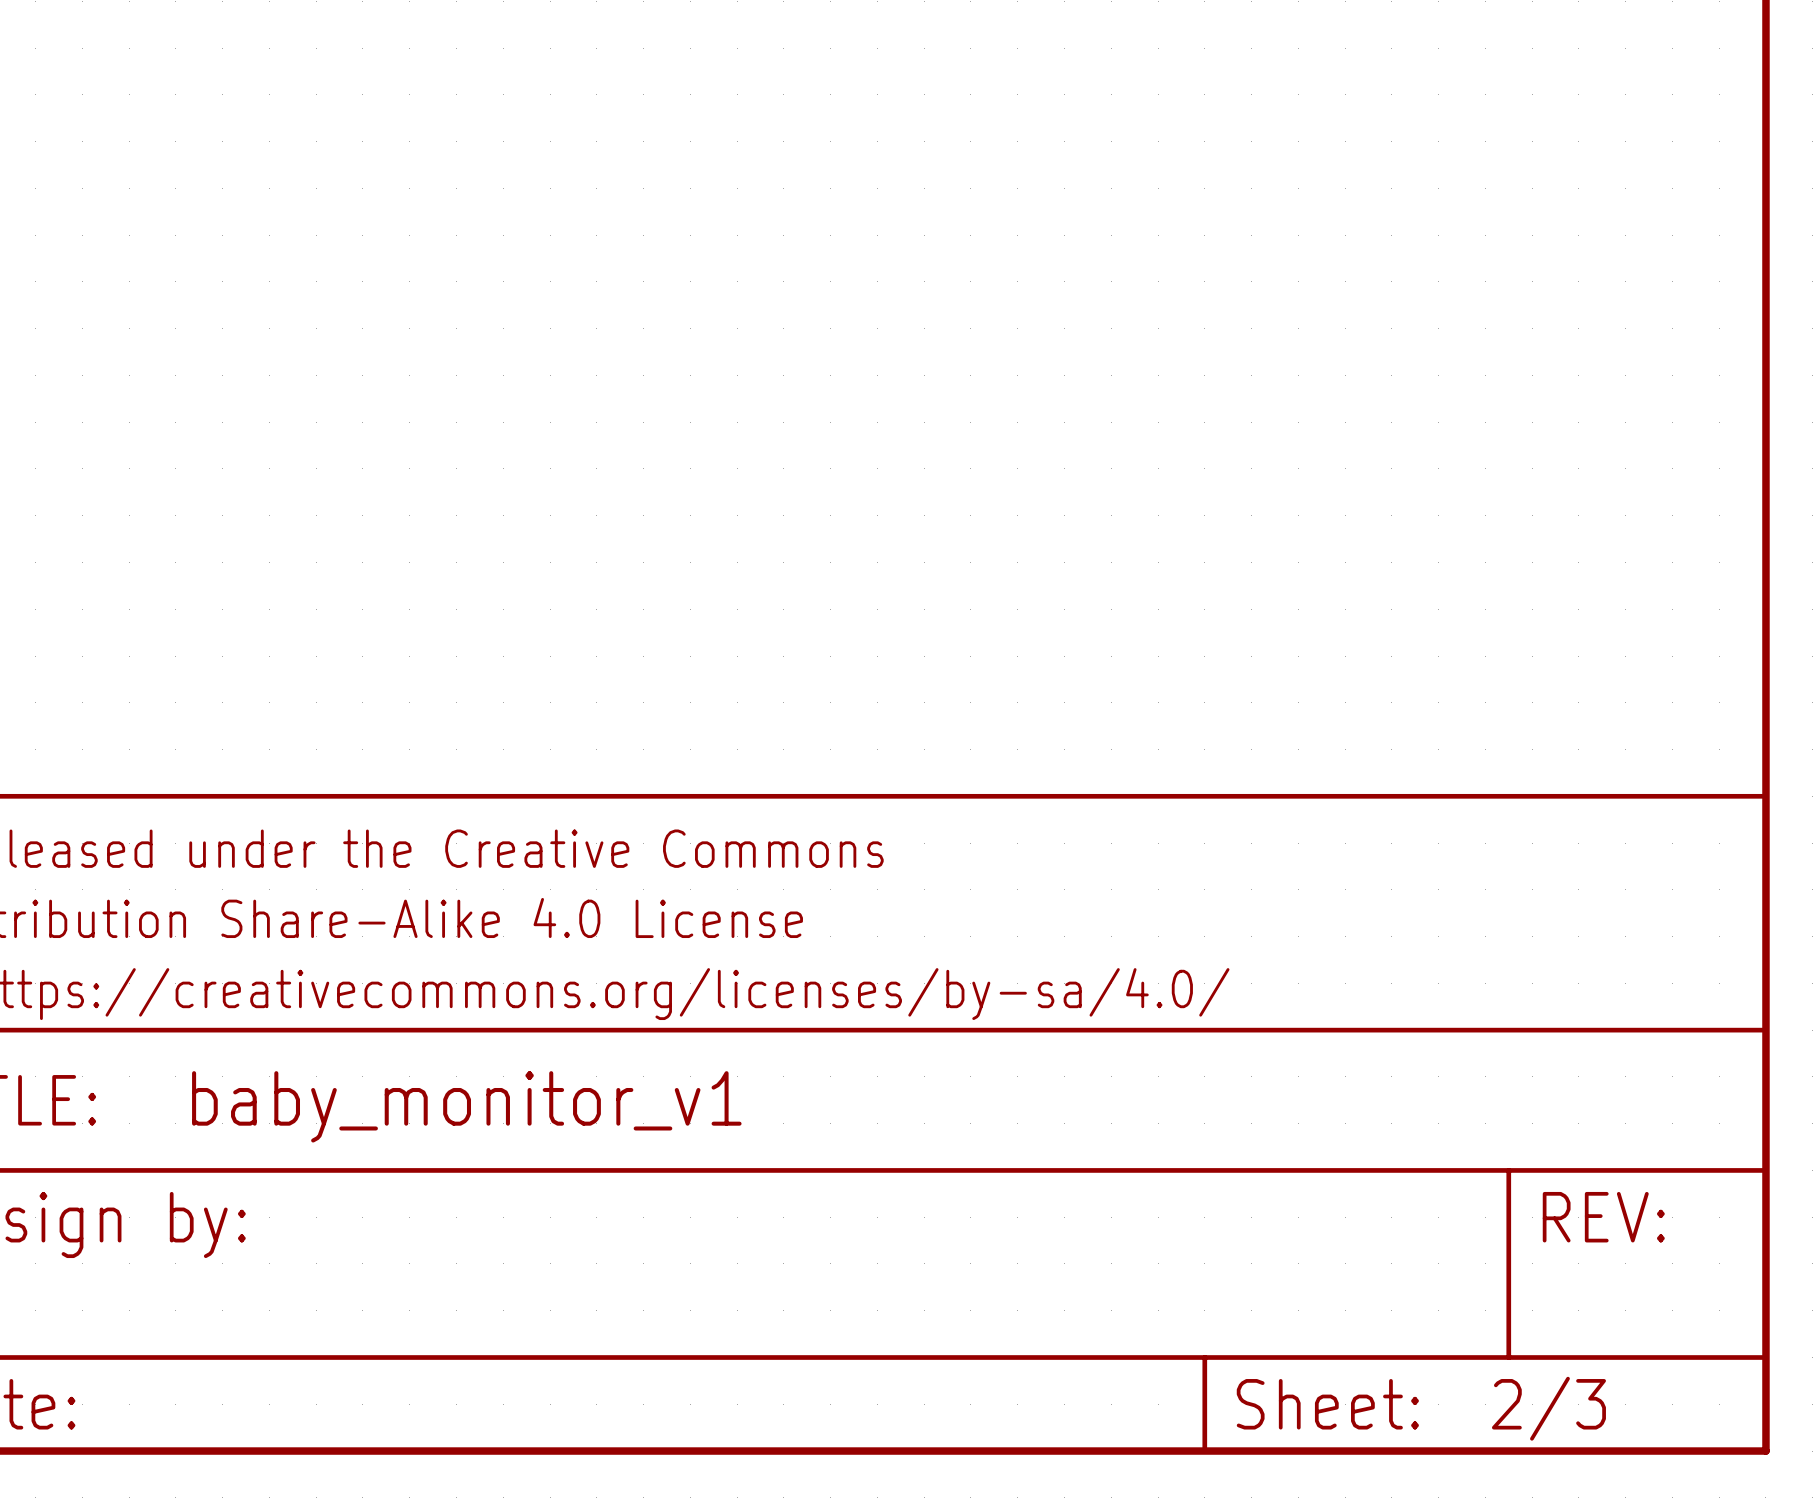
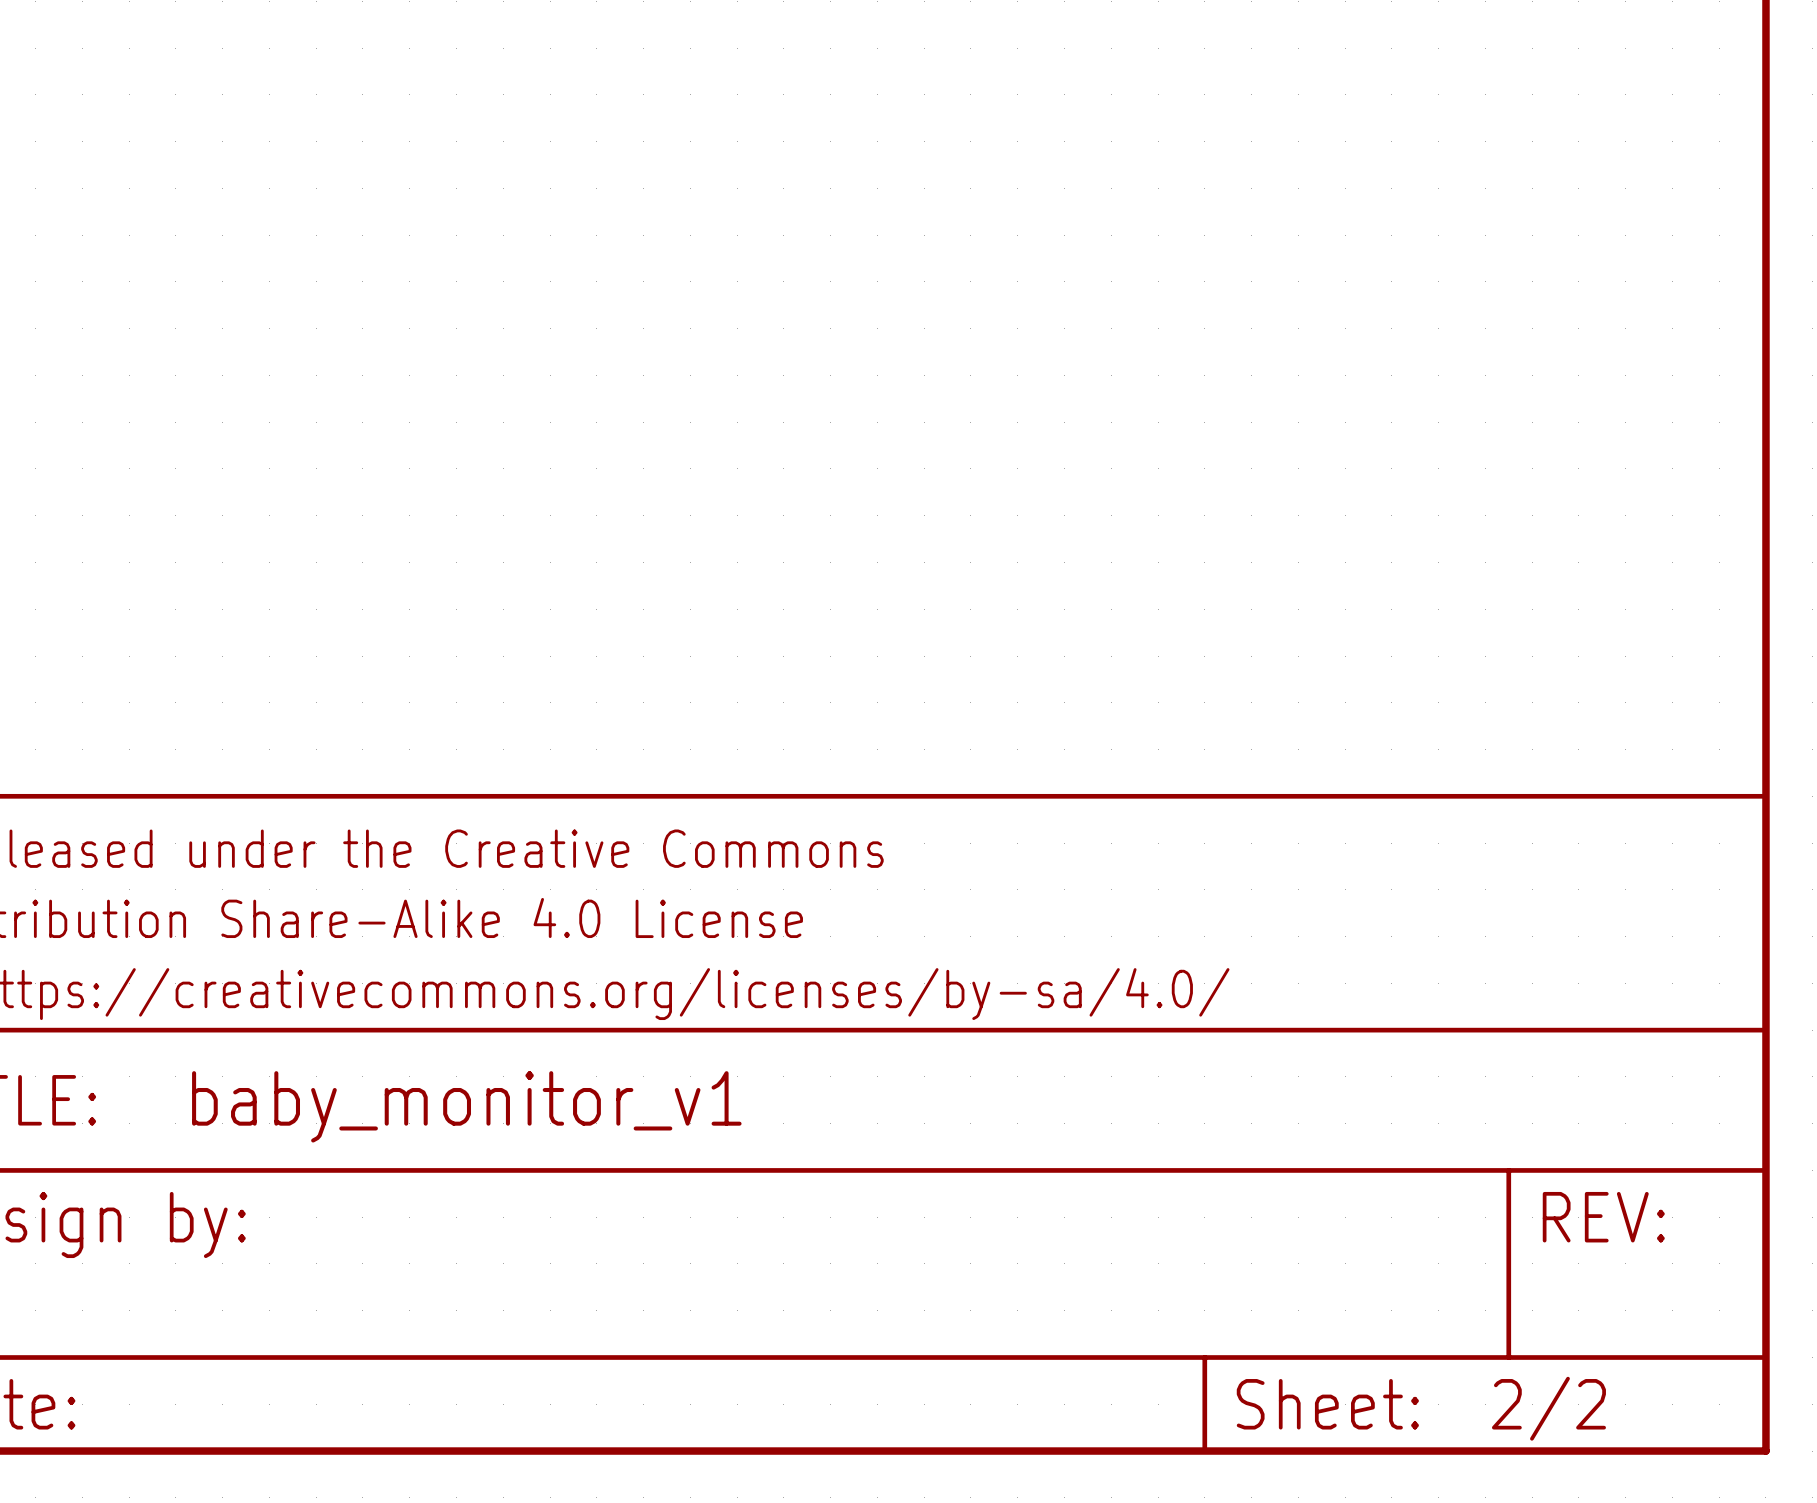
part text: 2/3 (1548, 1408) -> 2/2 (1548, 1408)

